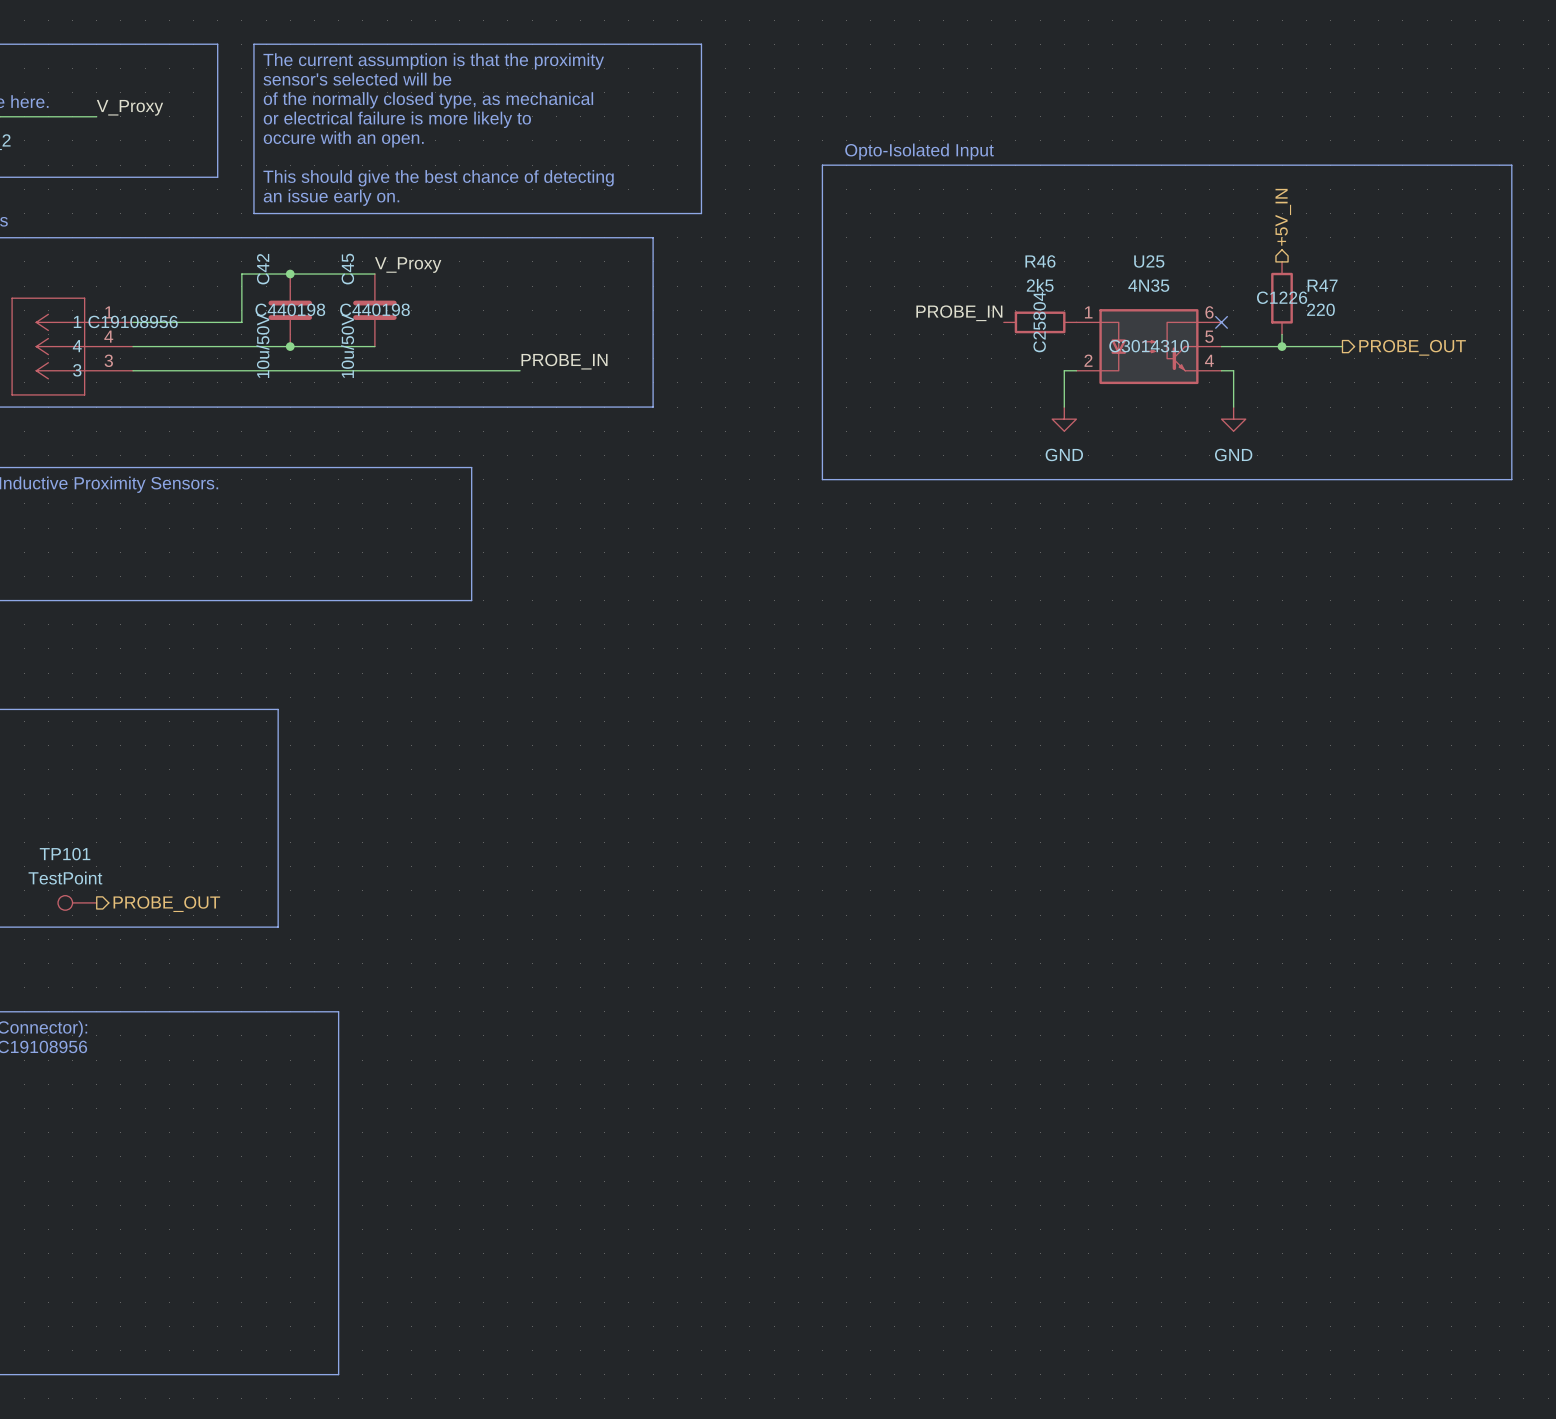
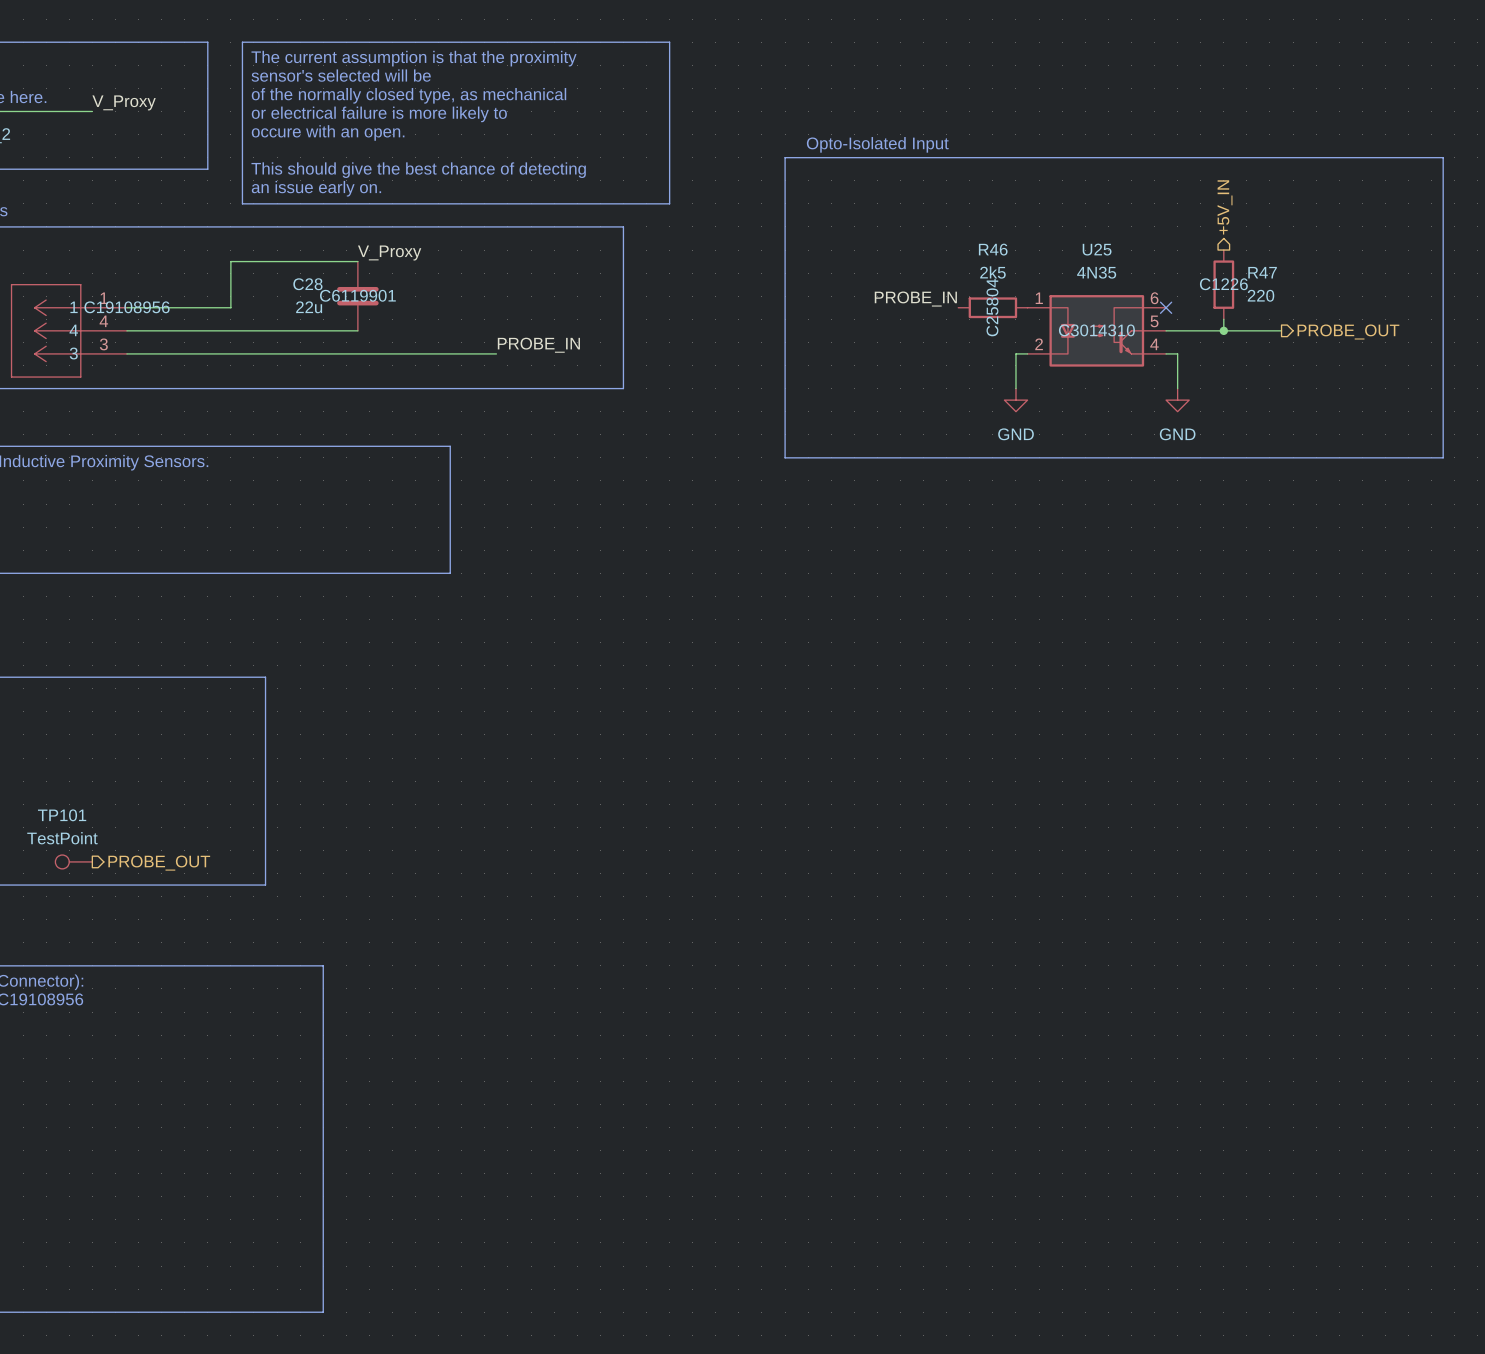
C45 name: C45 (347, 269) -> C28 (307, 284)
junction: (290, 274) -> none
C45 text: C440198 (374, 309) -> C6119901 (357, 295)
C42: 10u/50V (290, 310) -> none
C45 value: 10u/50V (347, 345) -> 22u (309, 307)
junction: (290, 346) -> none

